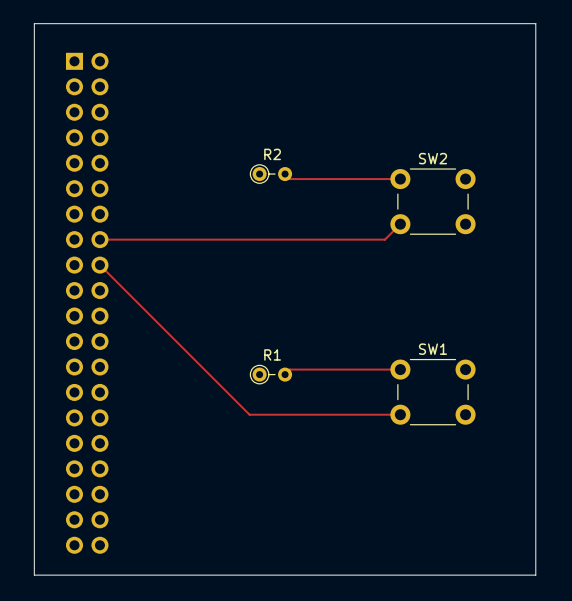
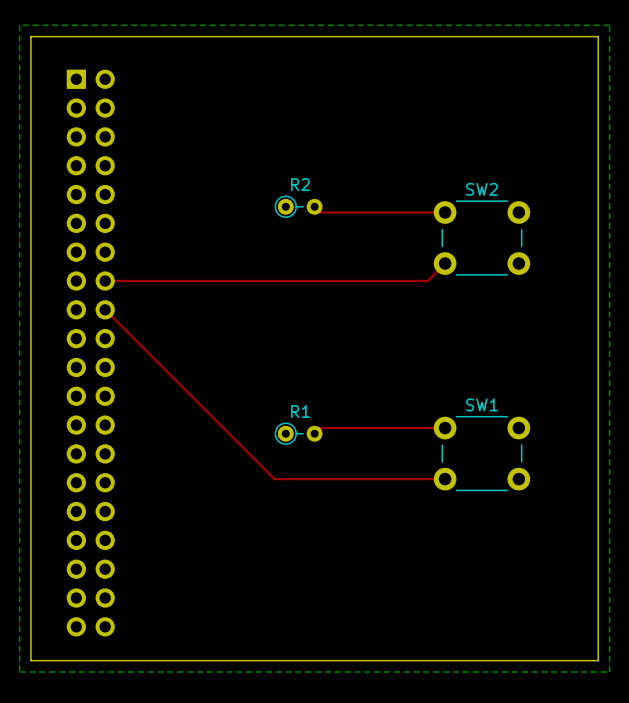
bottom zone outline: none -> (19, 25) (19, 671) (609, 671) (609, 25) (19, 25)

